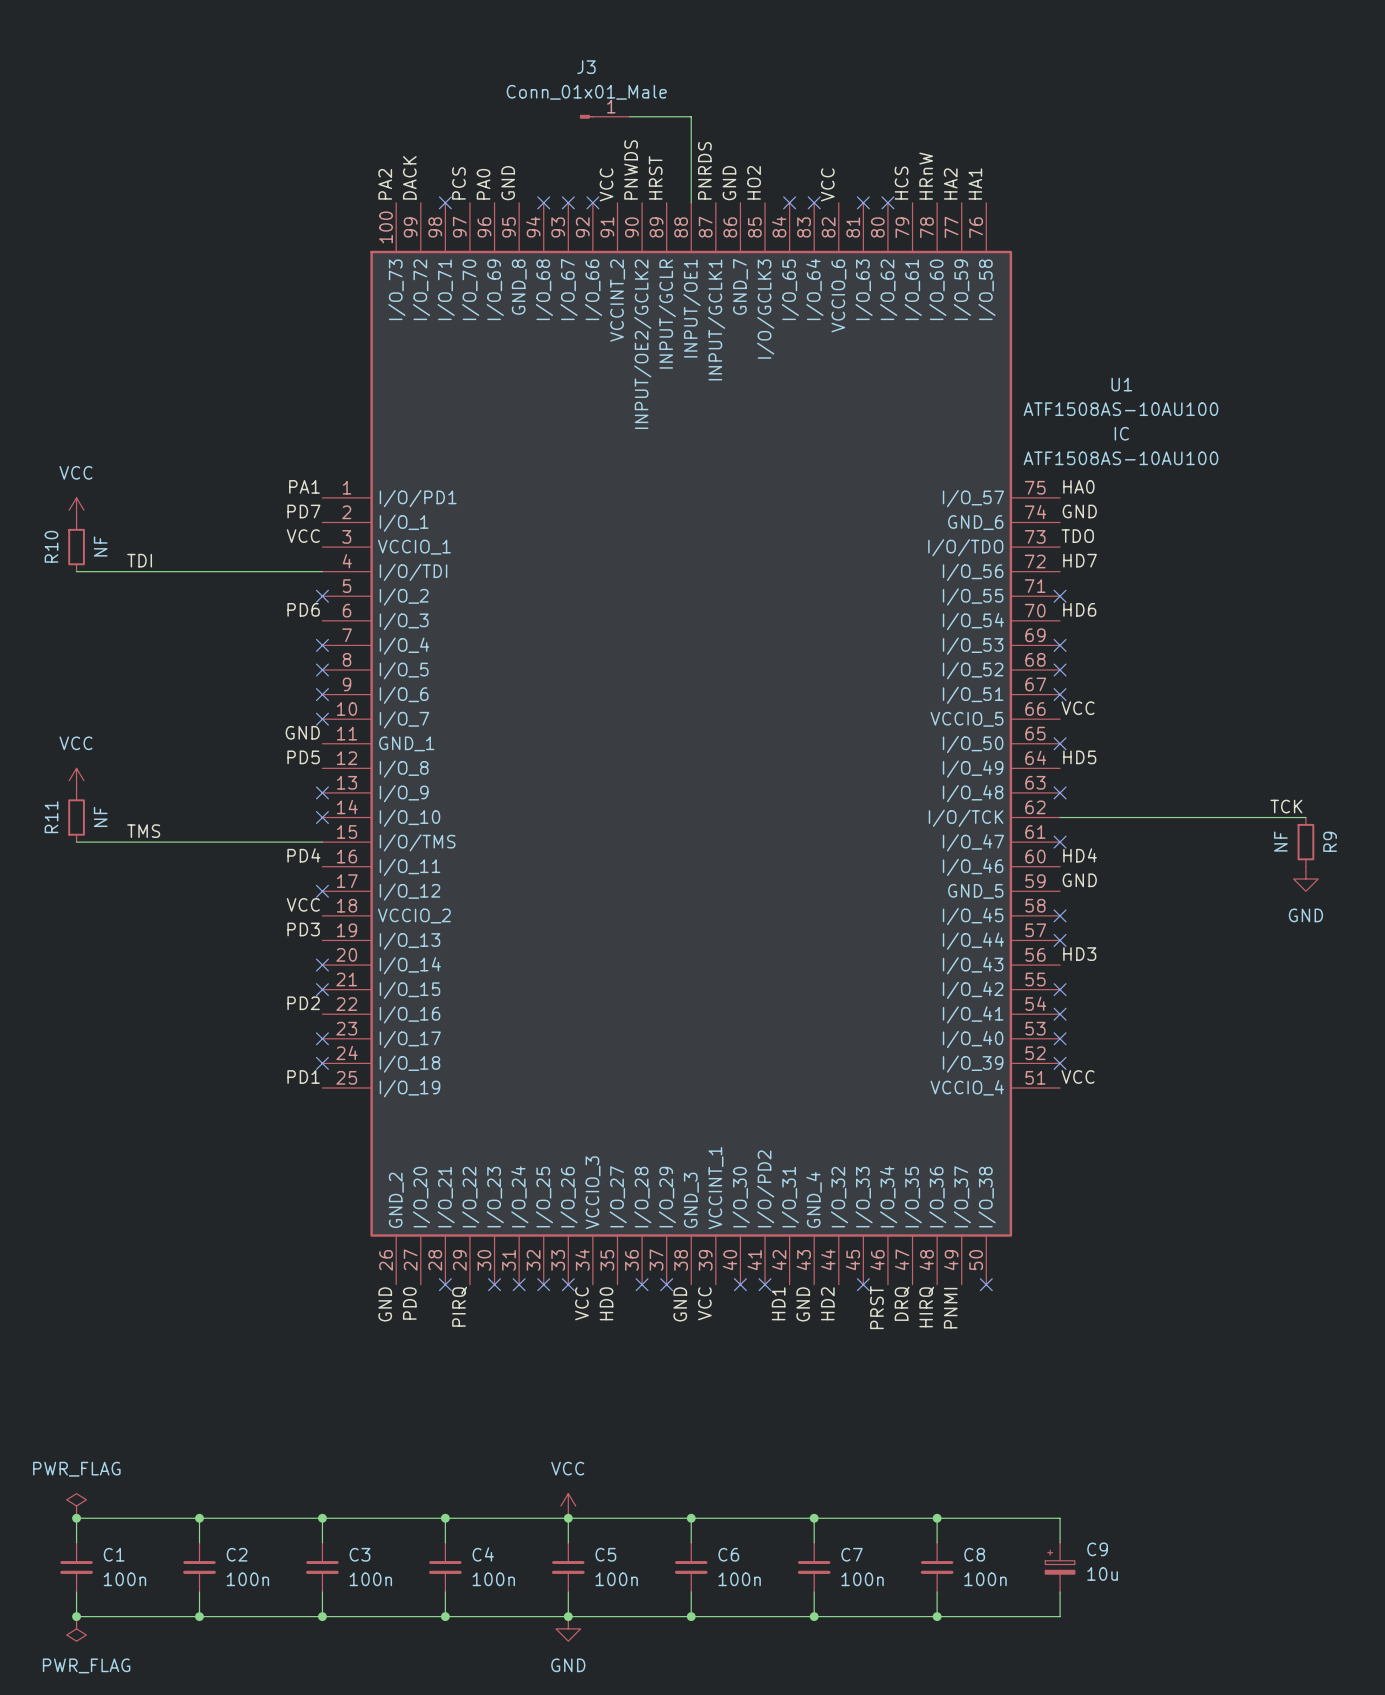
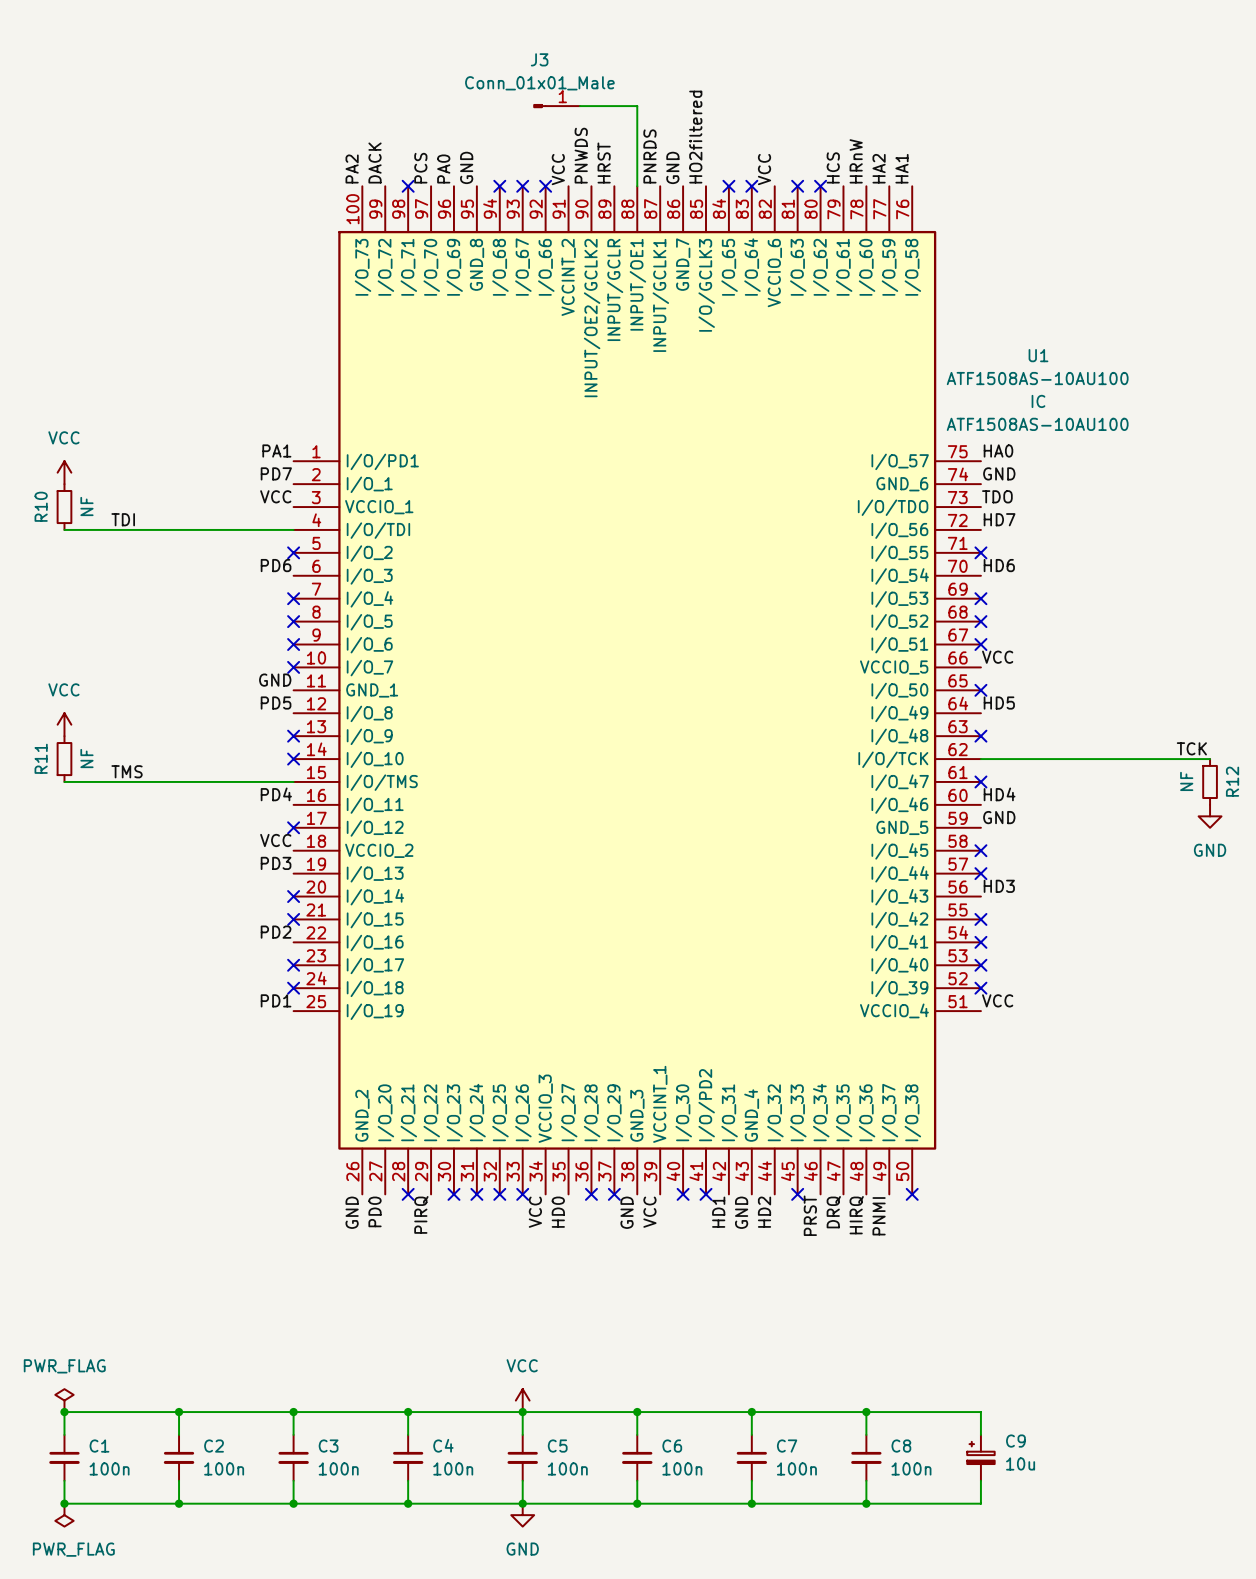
label: HO2 (754, 182) -> HO2filtered (695, 137)
R9 name: R9 (1330, 841) -> R12 (1232, 781)

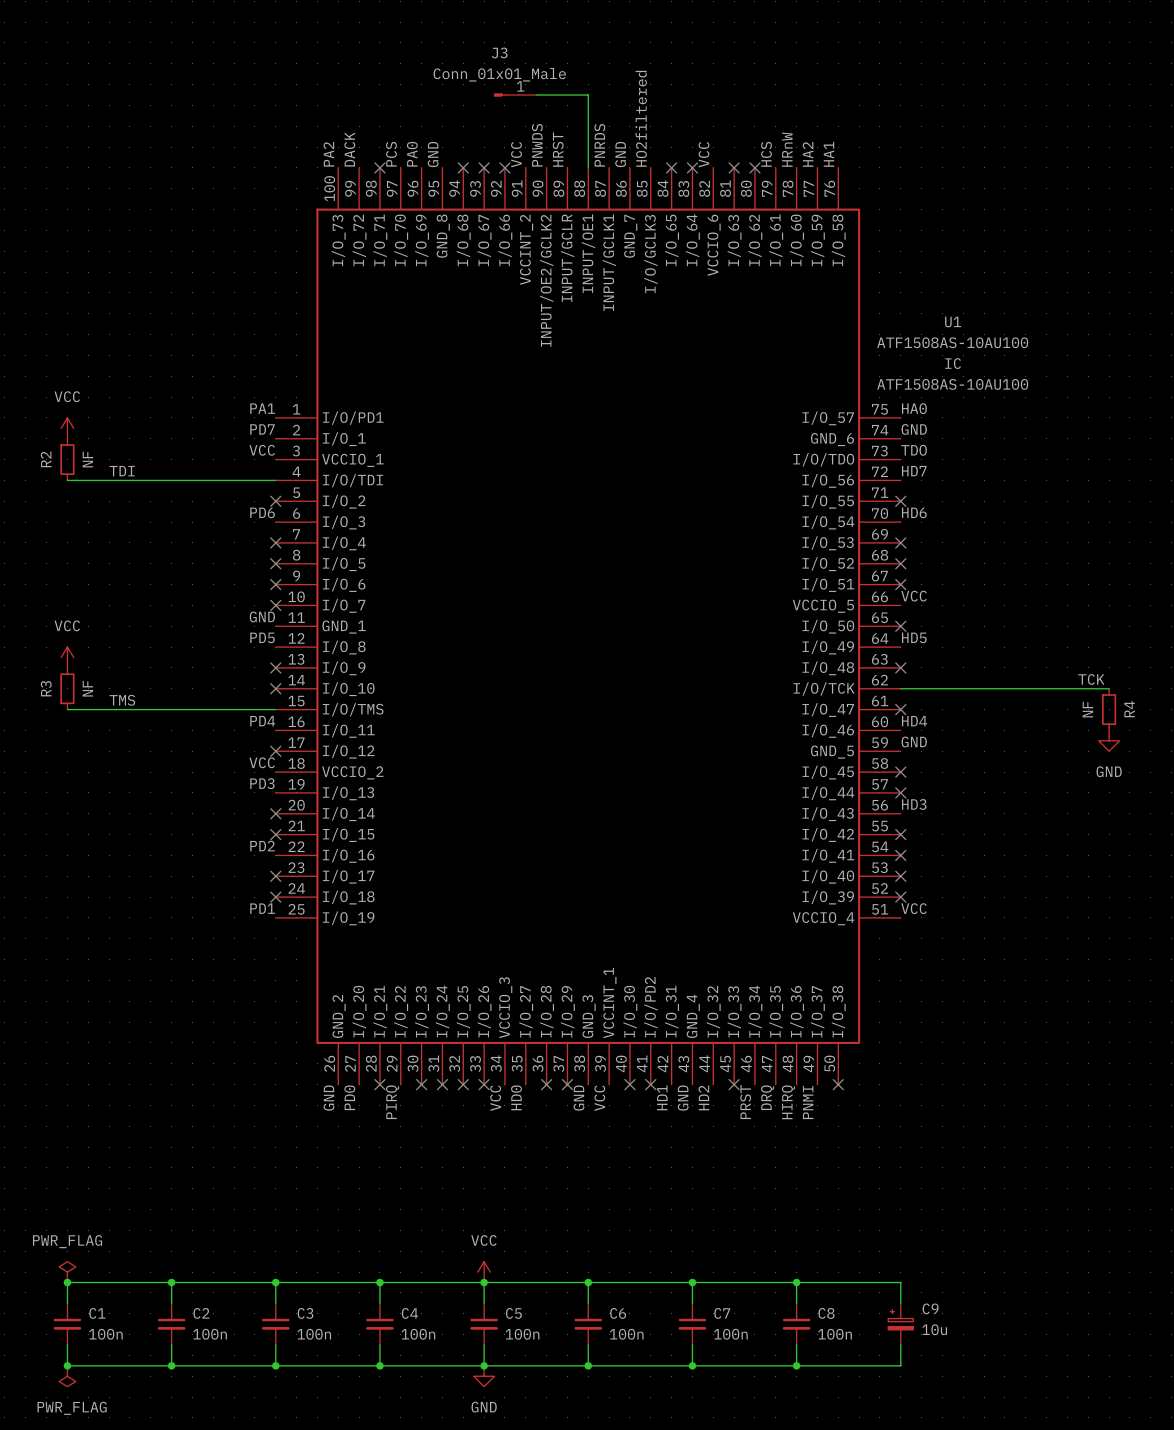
R10 name: R10 (41, 506) -> R2 (46, 459)
R11 name: R11 (41, 758) -> R3 (46, 688)
R12 name: R12 (1232, 781) -> R4 (1129, 709)

